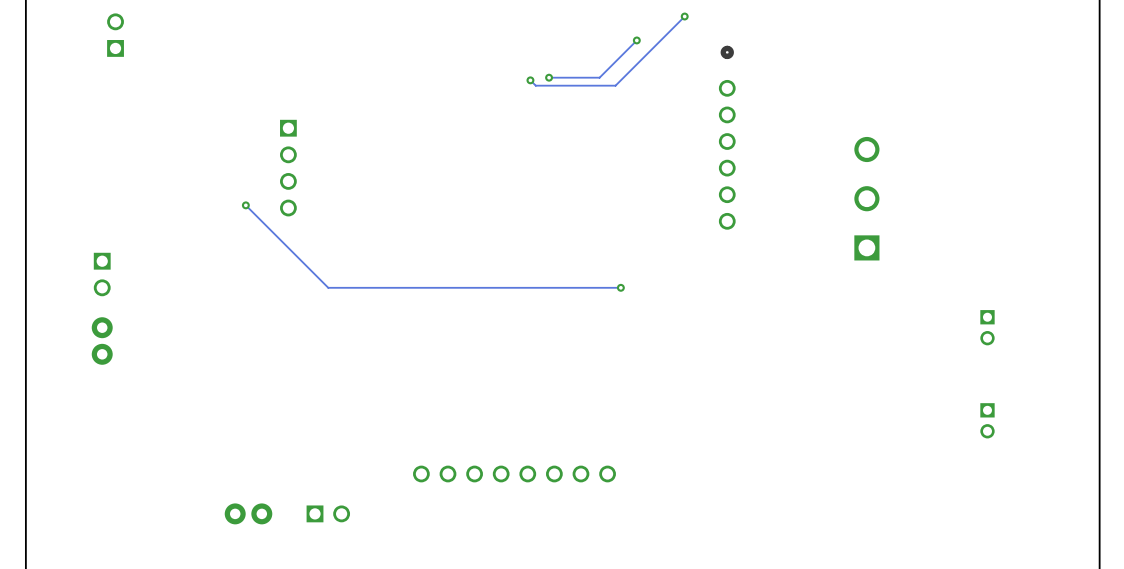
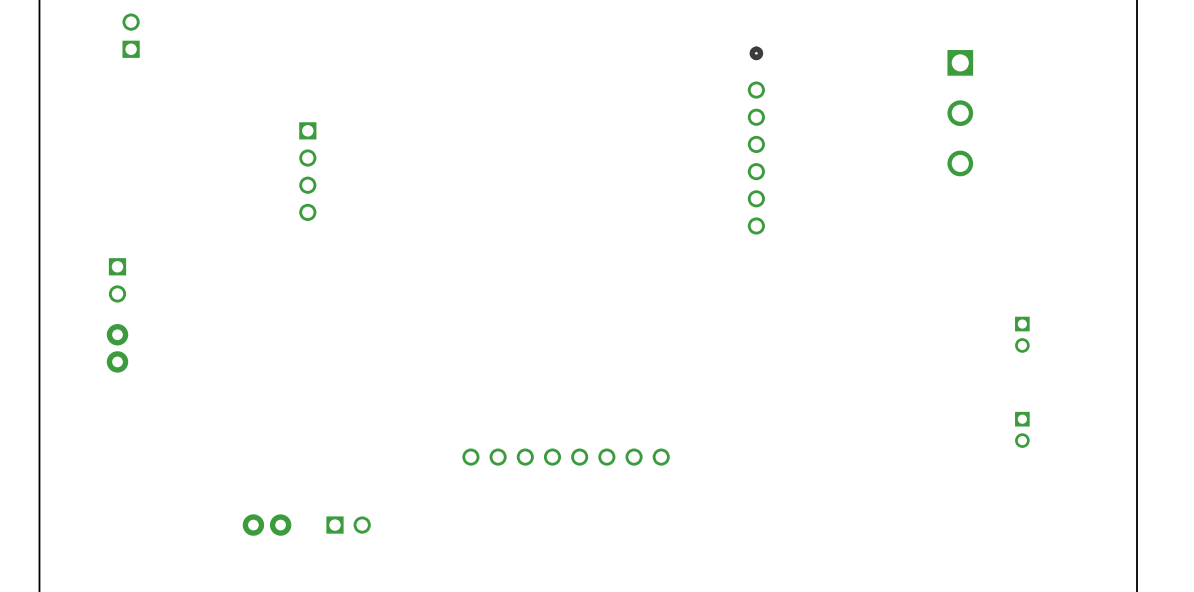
track: (684, 16) (615, 85) (535, 85) (530, 80) -> none
via: (684, 16) -> none
track: (636, 40) (599, 77) (549, 77) -> none
via: (636, 40) -> none
via: (549, 77) -> none
via: (530, 80) -> none
part rotation: 0° (866, 198) -> 180° (960, 113)
part position: (866, 198) -> (960, 113)
track: (245, 205) (328, 287) (620, 287) -> none
via: (245, 205) -> none
via: (620, 287) -> none
part position: (514, 473) -> (566, 457)

